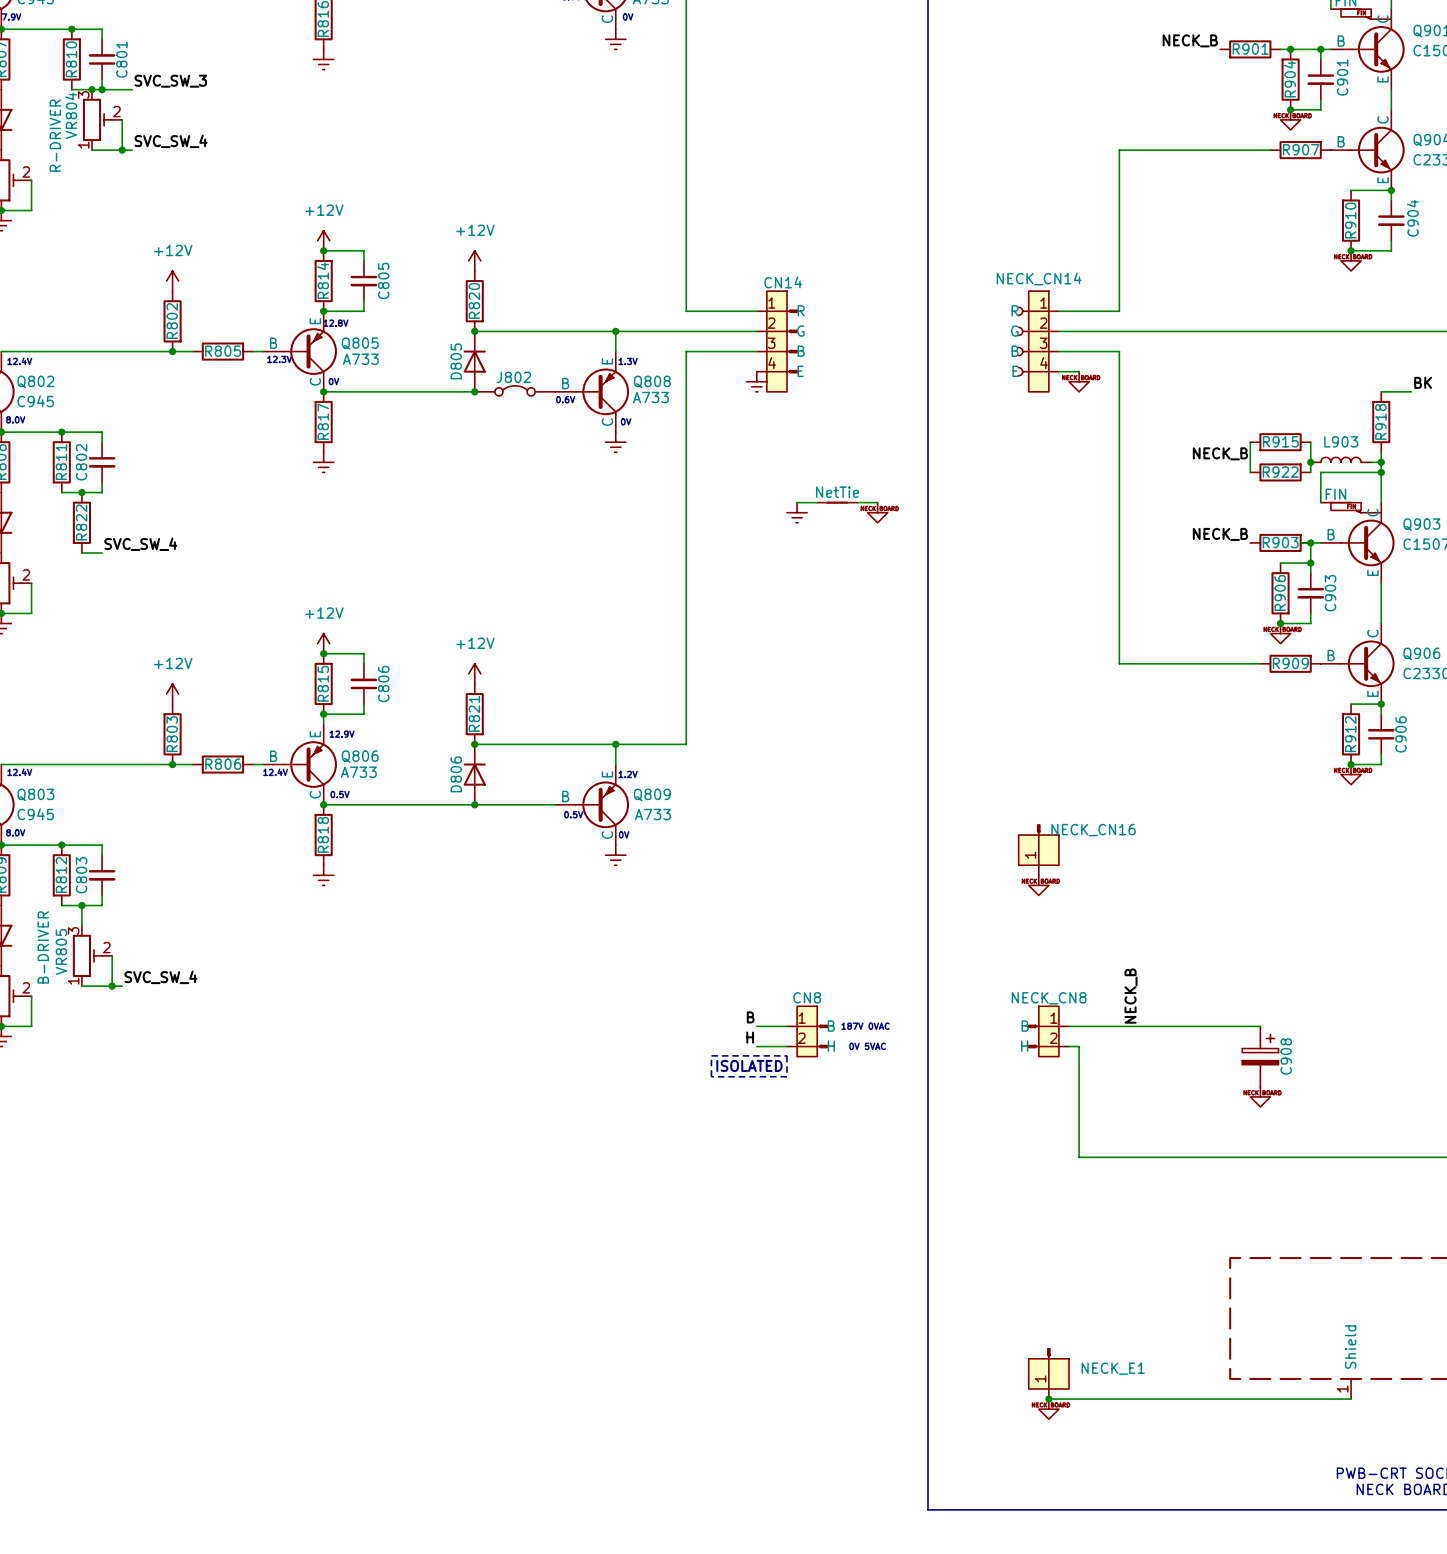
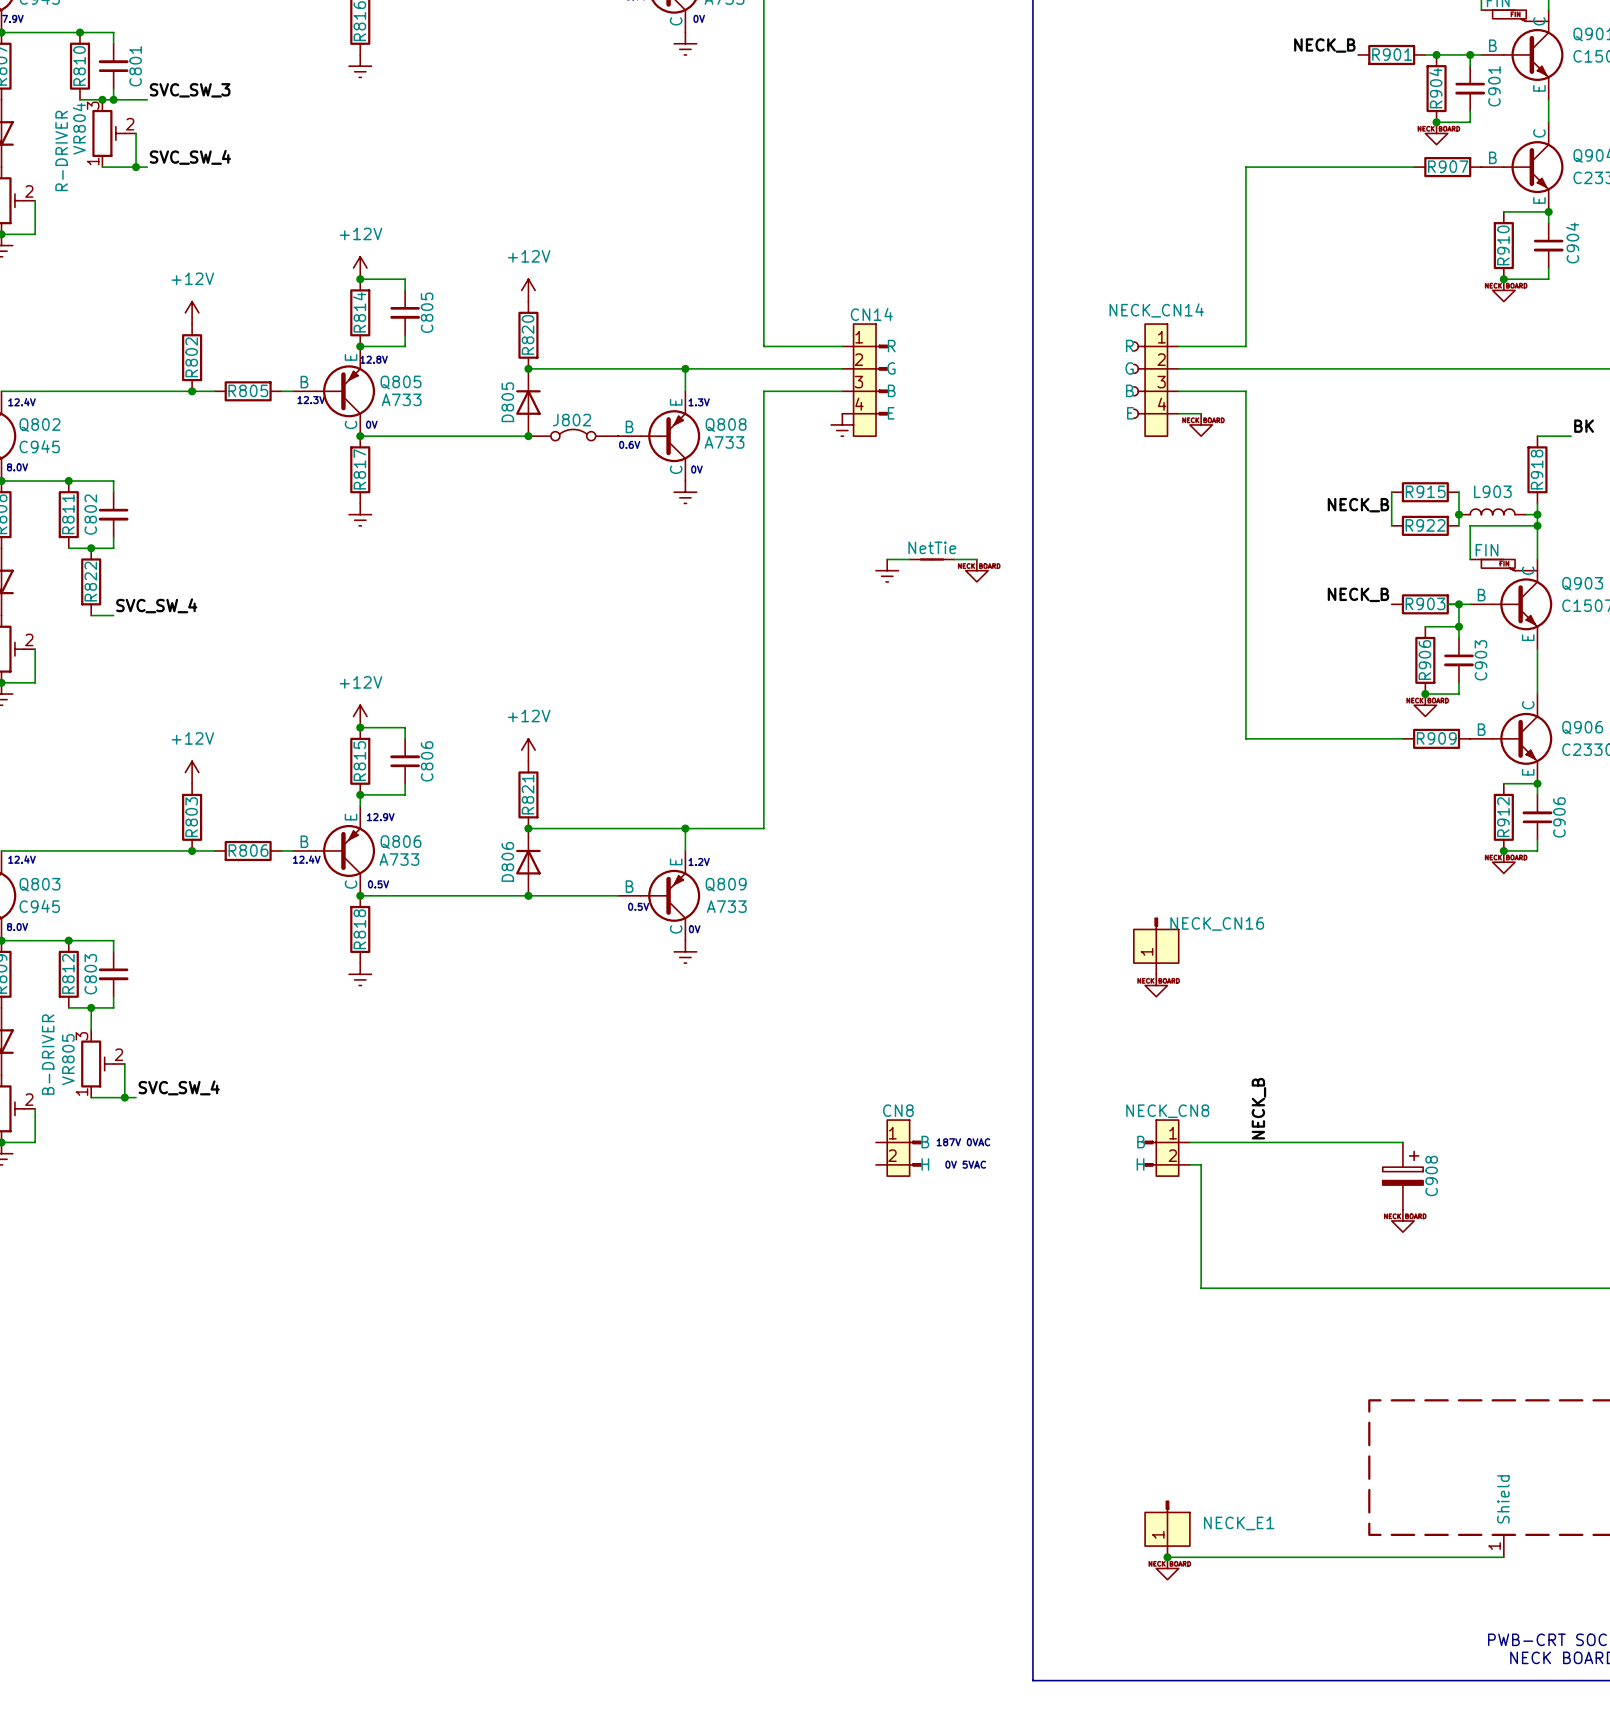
label: B (750, 1017) -> none
wire: (756, 1026) (786, 1026) -> none
label: H (750, 1037) -> none
wire: (756, 1046) (786, 1046) -> none
line: (711, 1055) (786, 1055) (786, 1076) (711, 1076) (711, 1055) -> none
text: ISOLATED (749, 1065) -> none

